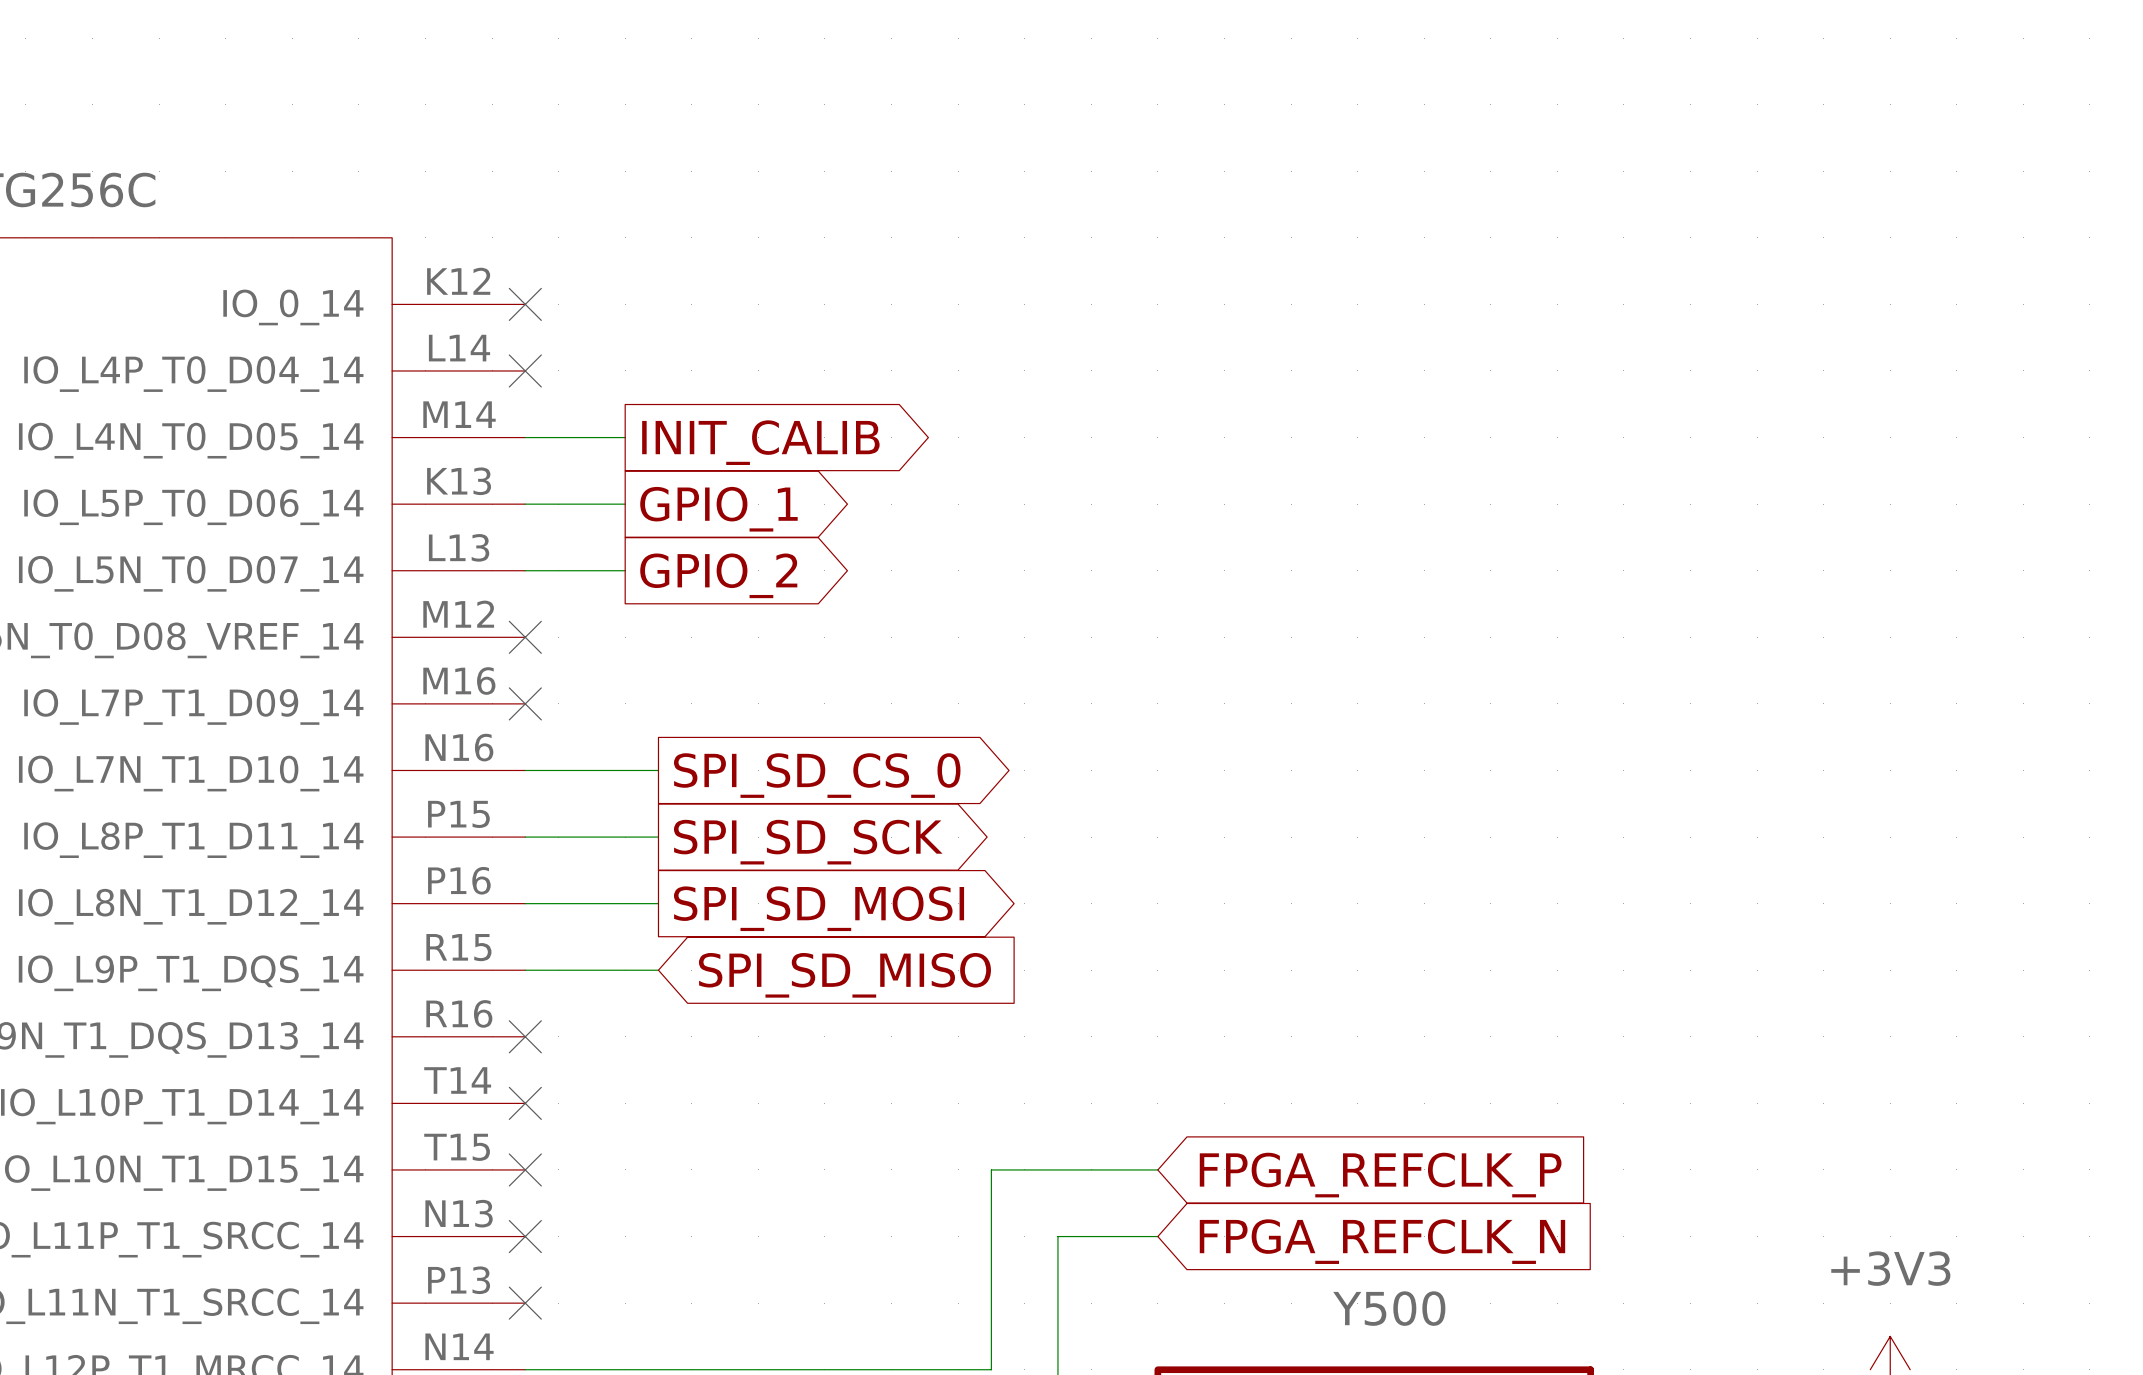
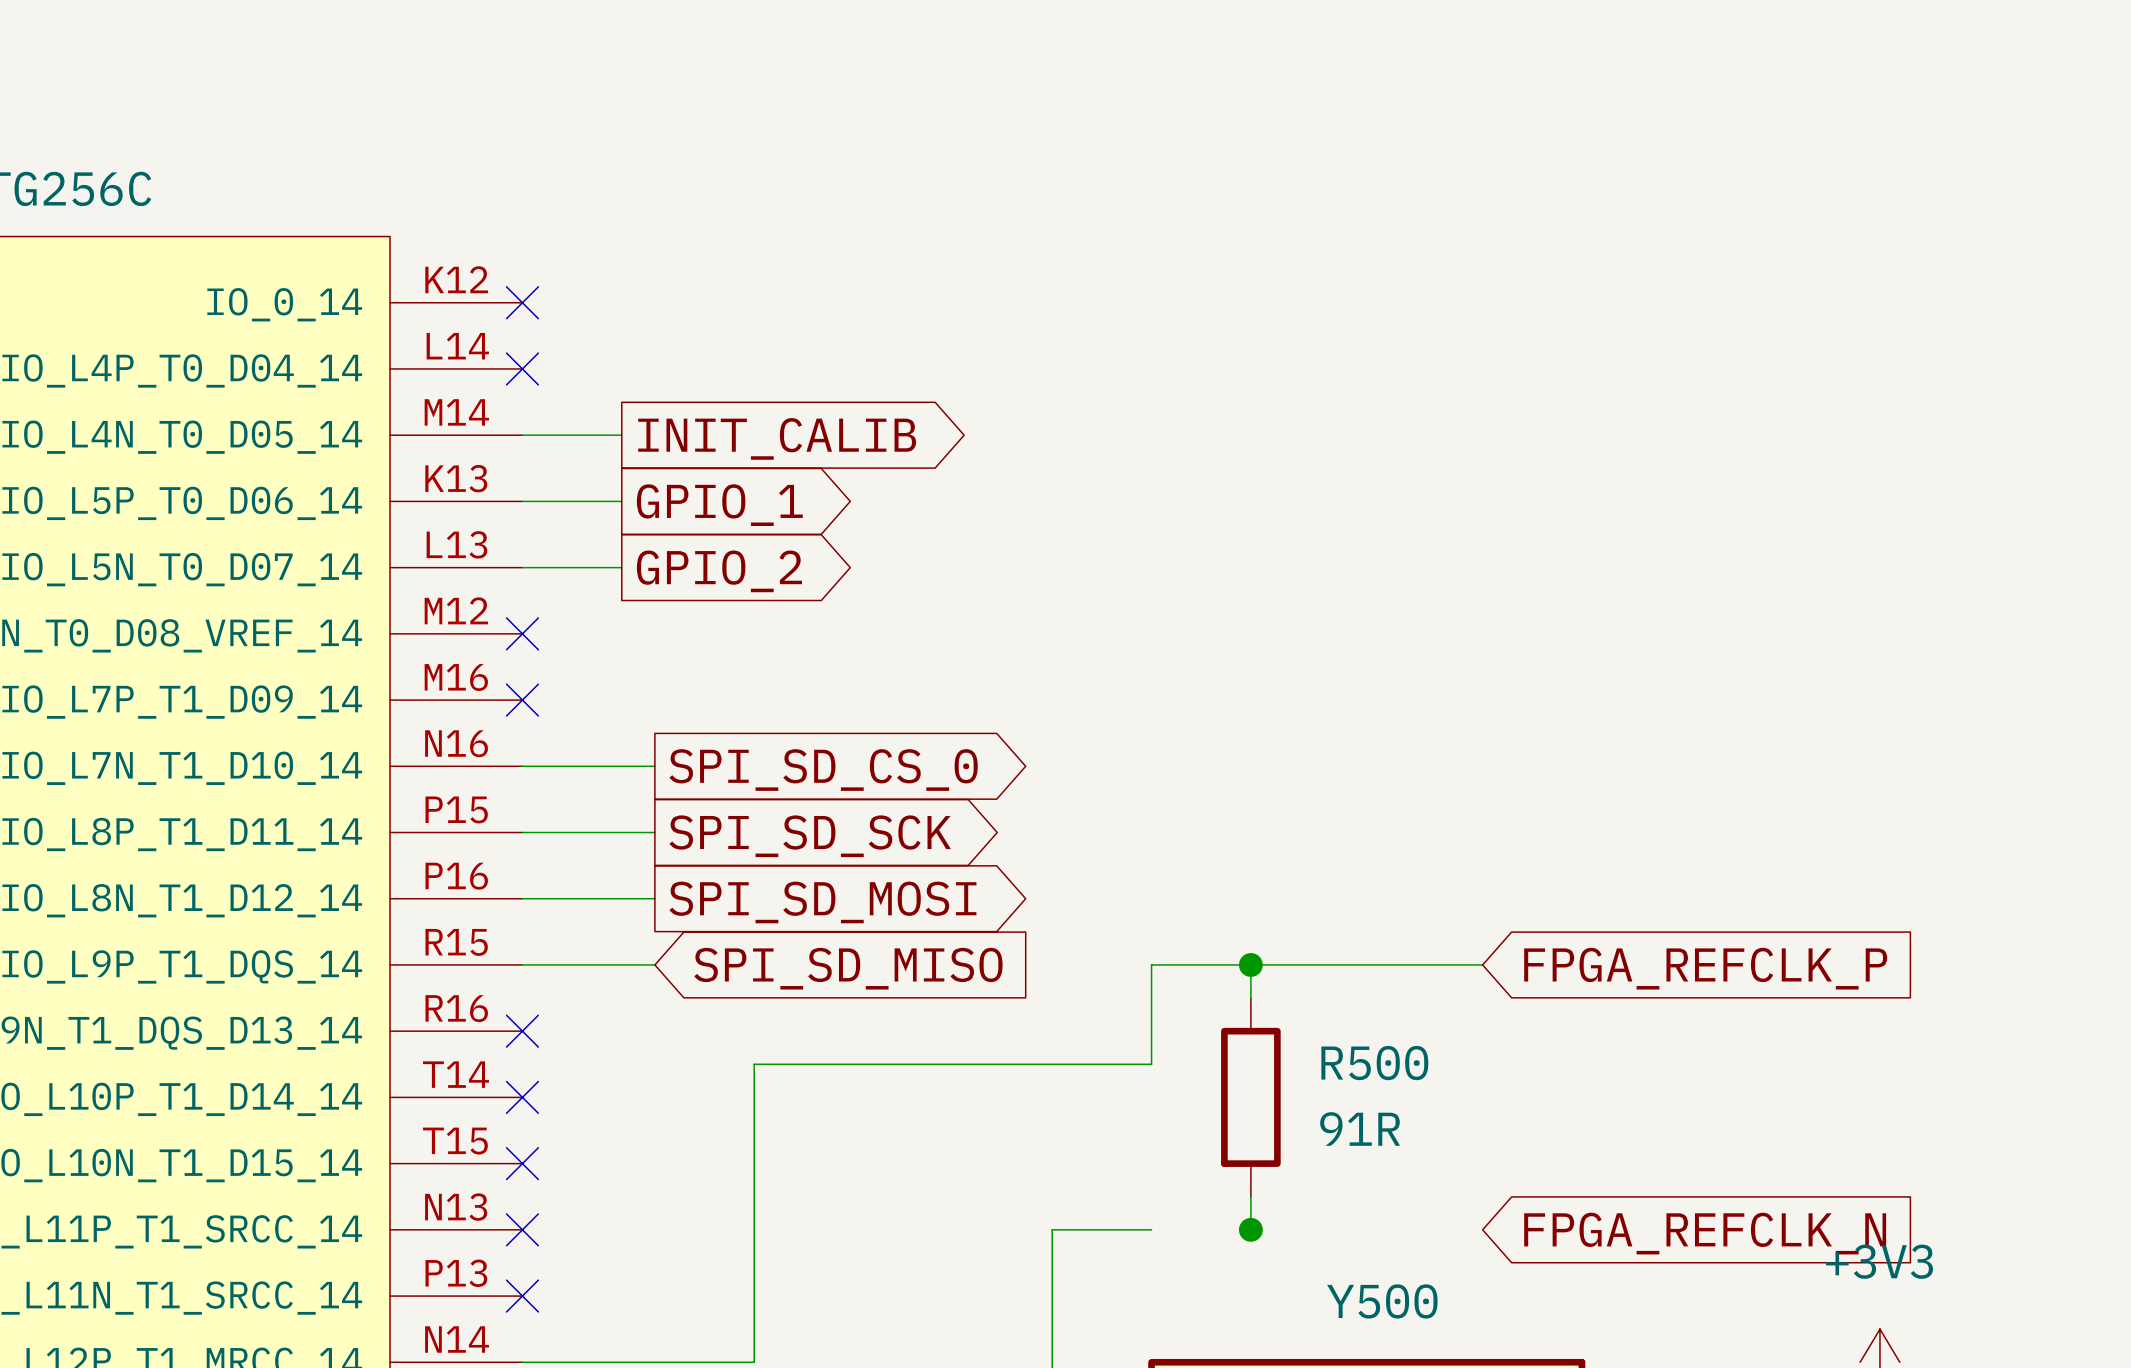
wire: none -> (1250, 964) (1250, 998)
junction: none -> (1250, 964)
R500: none -> 91R (1250, 1097)
wire: (1157, 1169) (991, 1169) (991, 1369) (758, 1369) -> (1482, 964) (1151, 964) (1151, 1064) (754, 1064) (754, 1362)
global label position: FPGA_REFCLK_P (1380, 1175) -> FPGA_REFCLK_P (1705, 968)
wire: none -> (1250, 1196) (1250, 1229)
junction: none -> (1250, 1229)
global label position: FPGA_REFCLK_N (1382, 1241) -> FPGA_REFCLK_N (1705, 1233)

